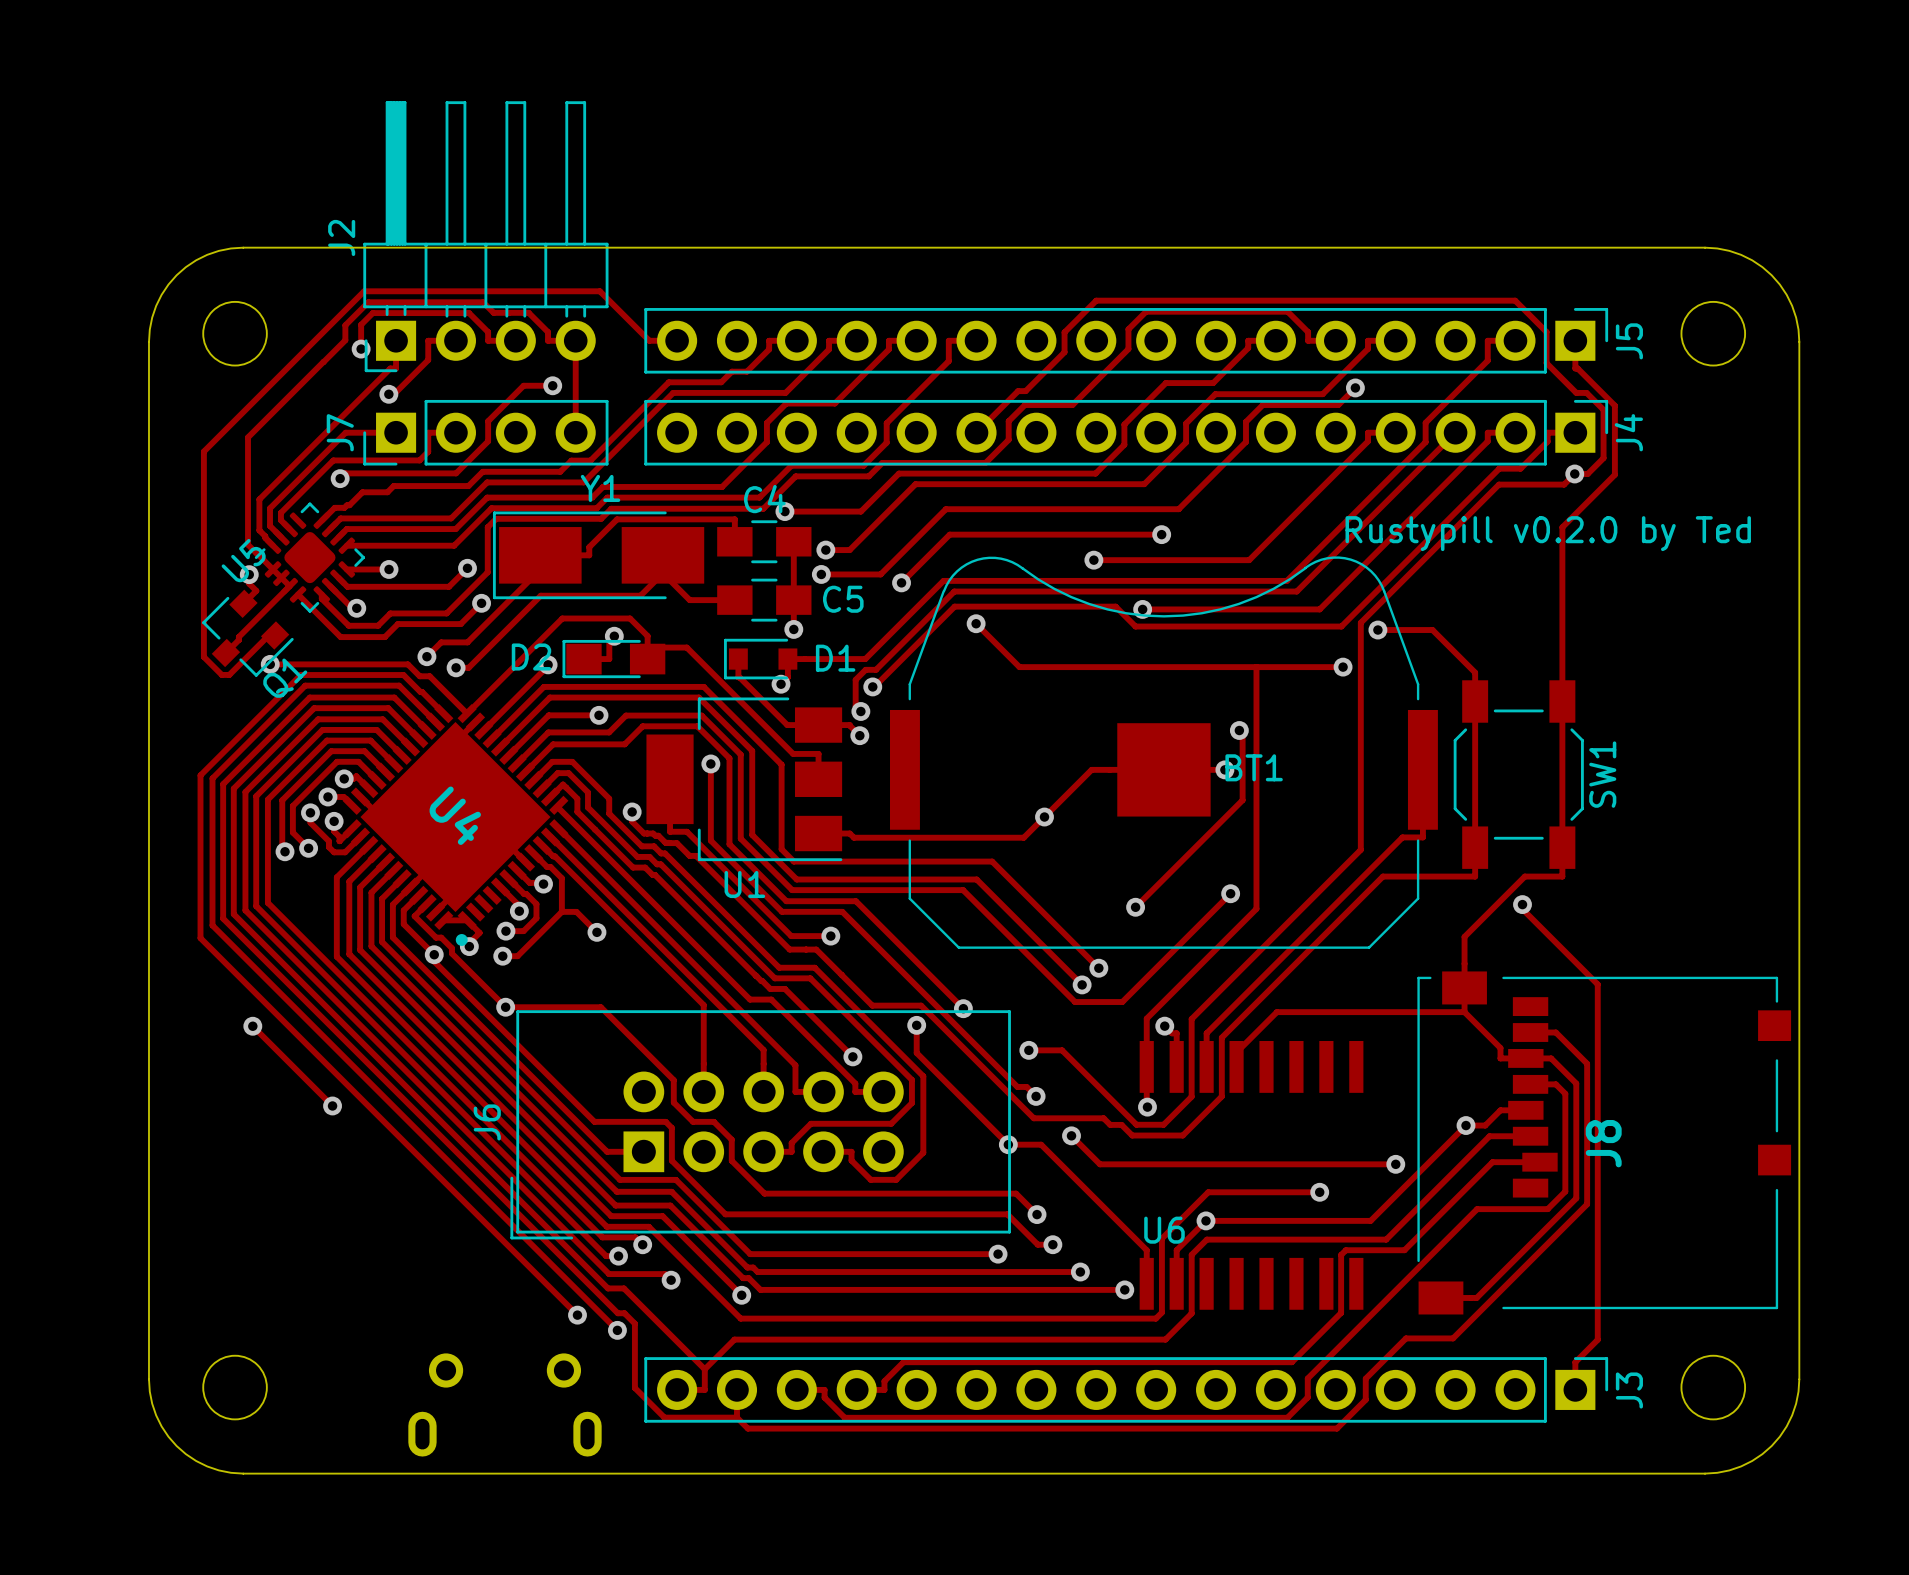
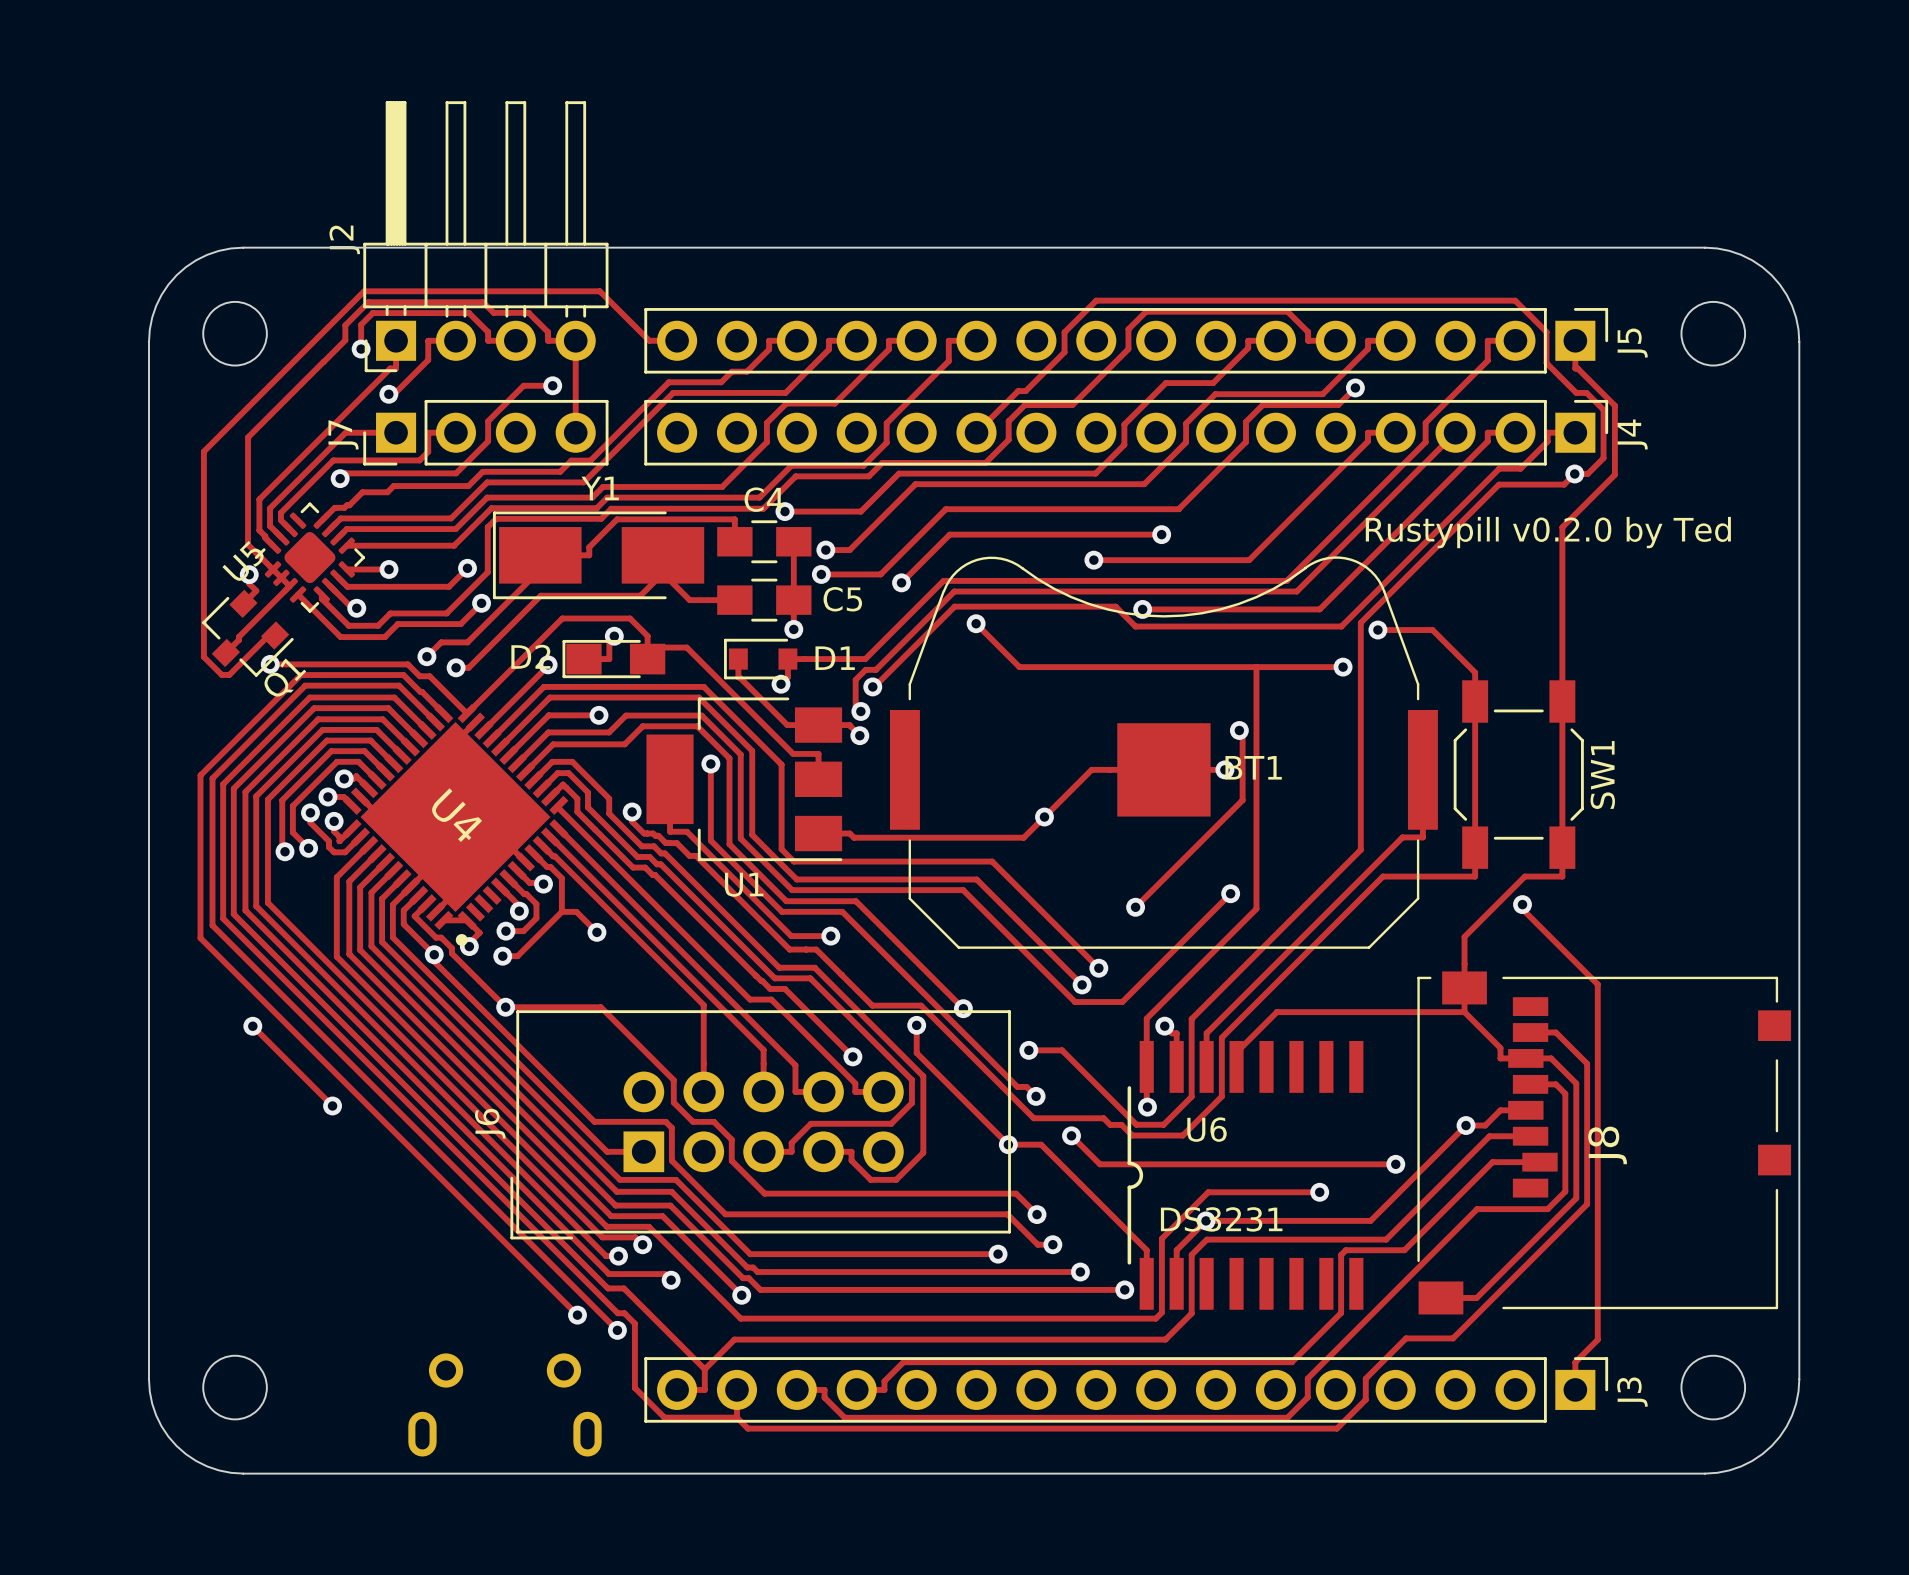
U6 footprint: [1139, 1041, 1364, 1310] -> [1127, 1041, 1364, 1310]
U6 value: none -> DS3231 (1221, 1219)
U6 name position: U6 (1164, 1230) -> U6 (1207, 1129)

